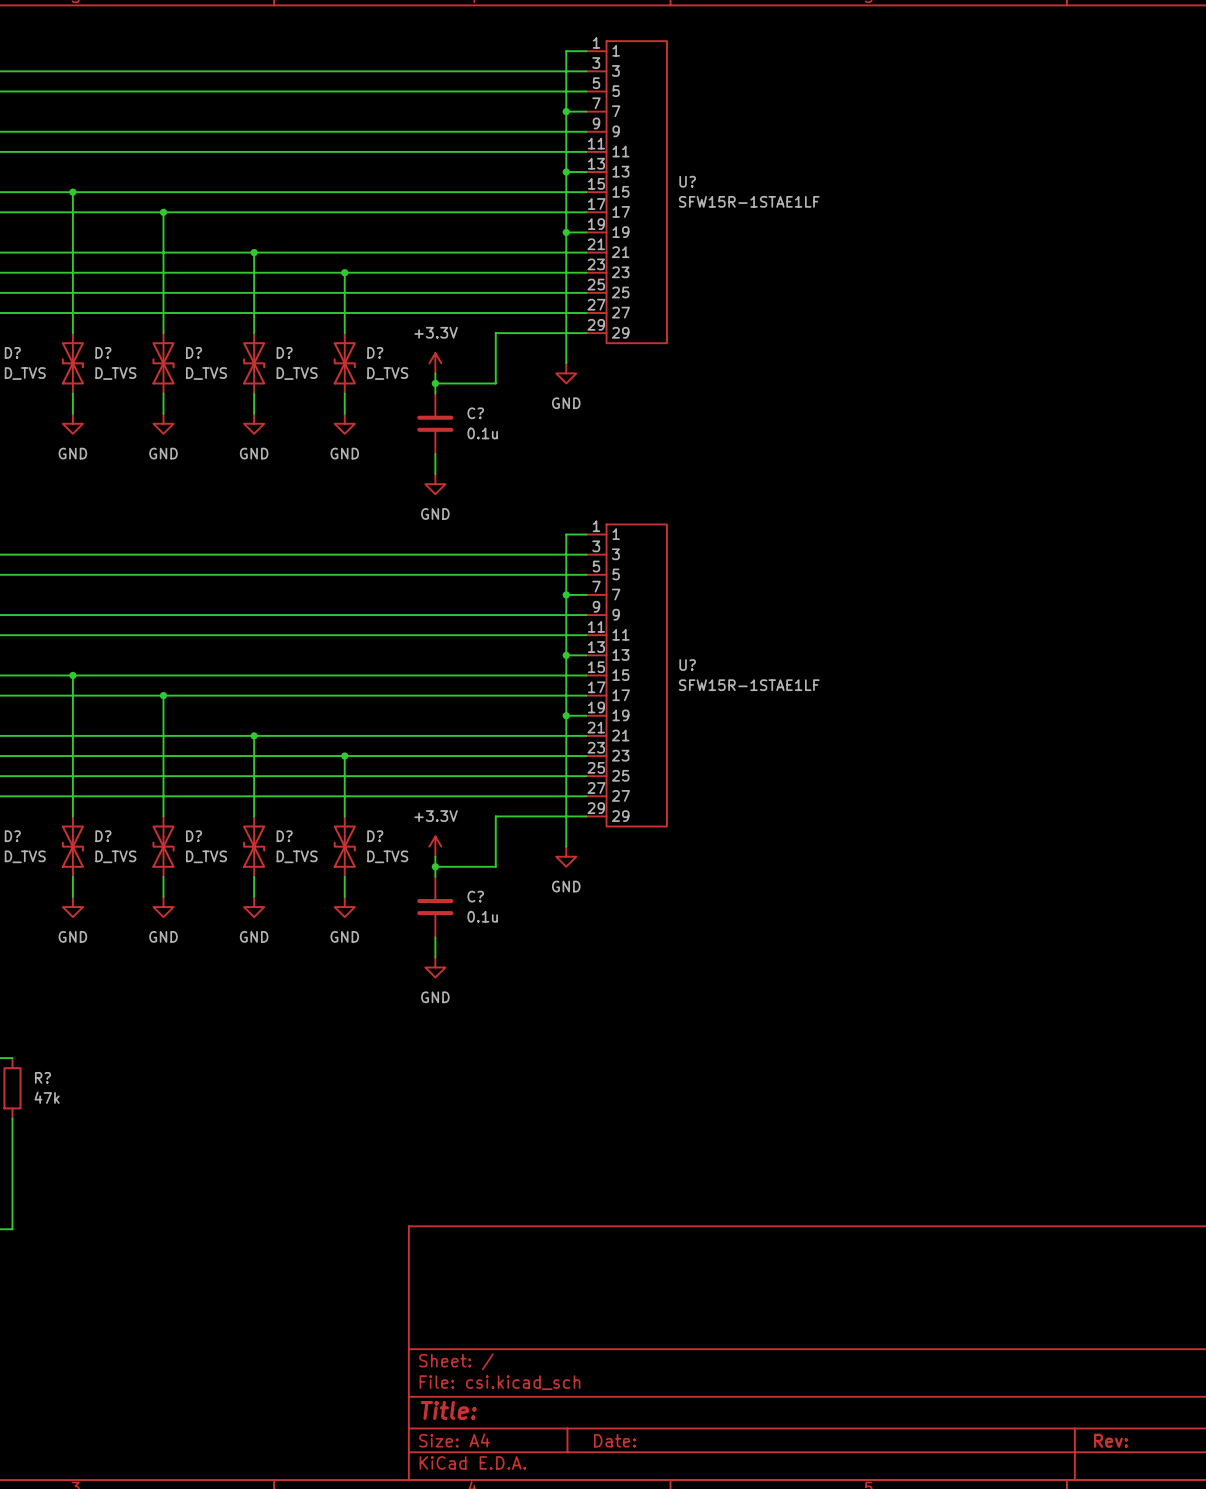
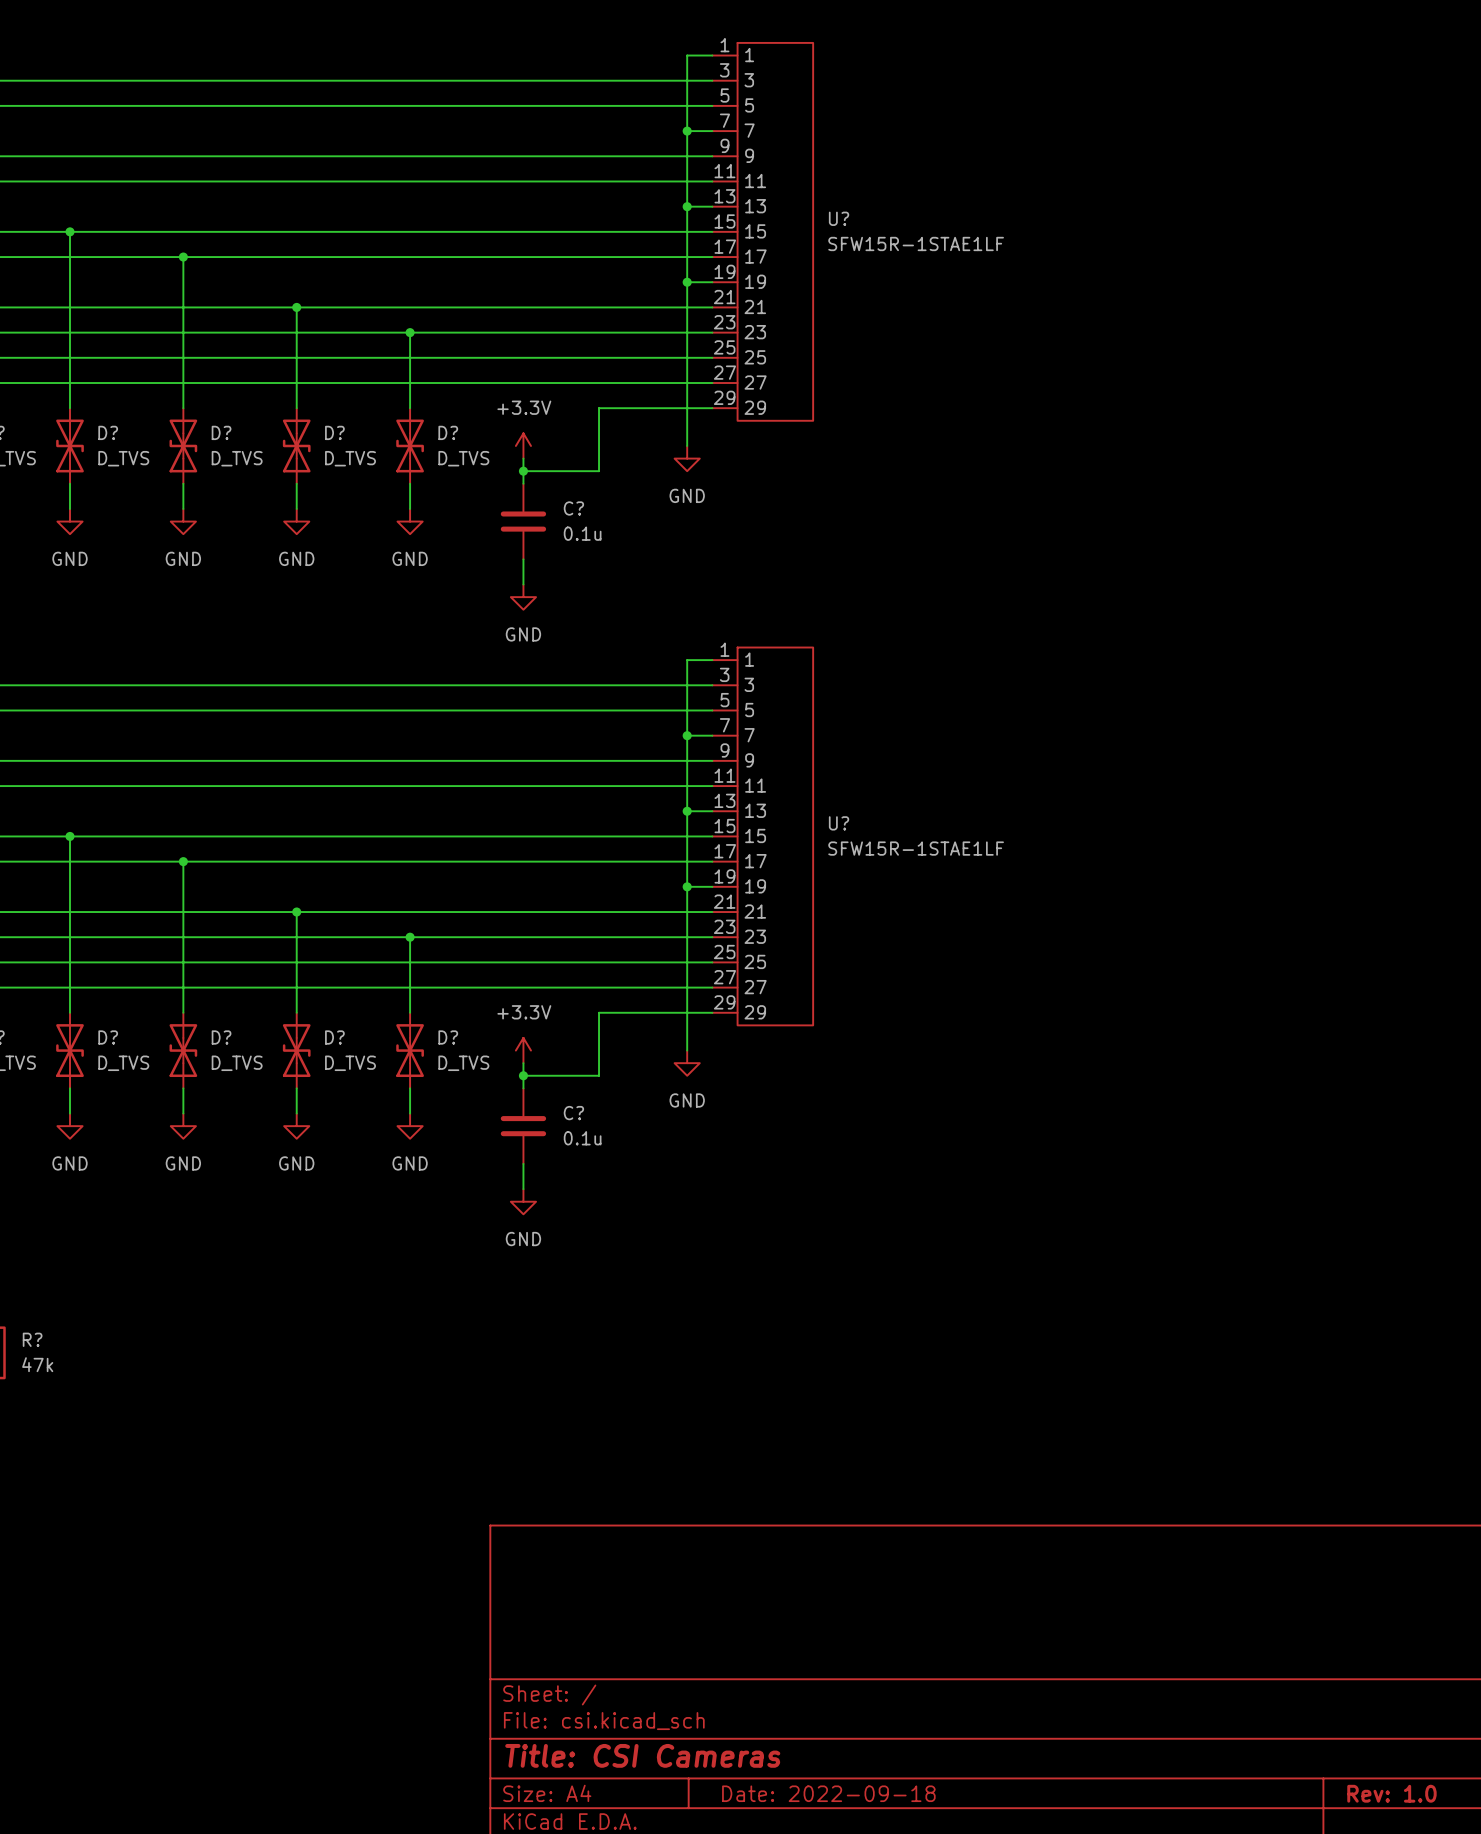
title block: Title: (448, 1410) -> Title: CSI Cameras (642, 1755)
title block: Date: (614, 1440) -> Date: 2022-09-18 (828, 1793)
title block: Rev: (1110, 1440) -> Rev: 1.0 (1391, 1793)

